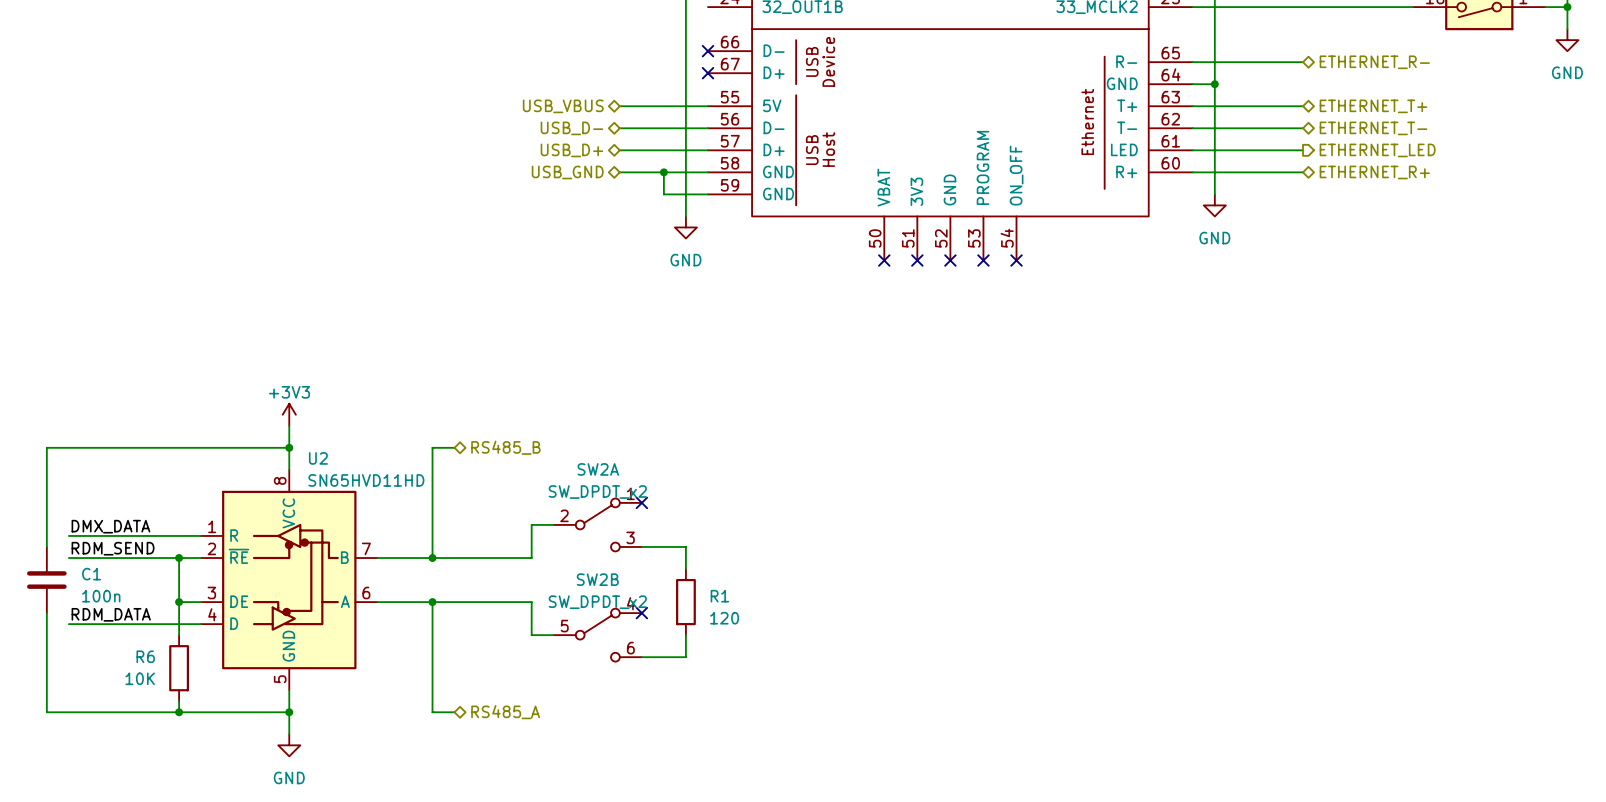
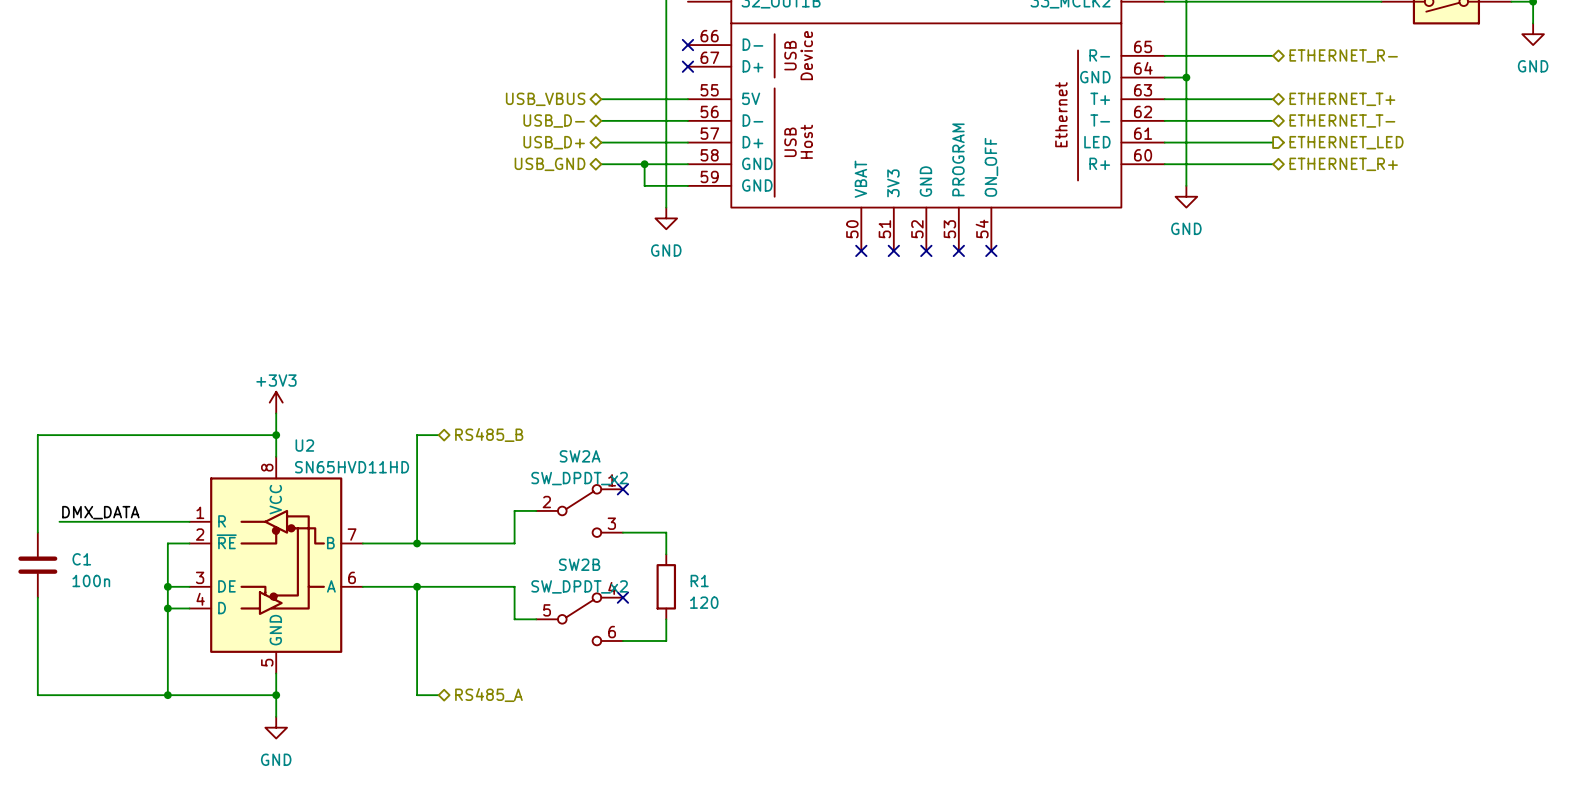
label: RDM_SEND (113, 548) -> none
wire: (68, 558) (179, 558) -> none
junction: (179, 558) -> none
label: RDM_DATA (111, 614) -> none
wire: (68, 624) (179, 624) -> none
junction: none -> (167, 608)
wire: none -> (167, 619) (167, 684)
R6: 10K (179, 668) -> none

